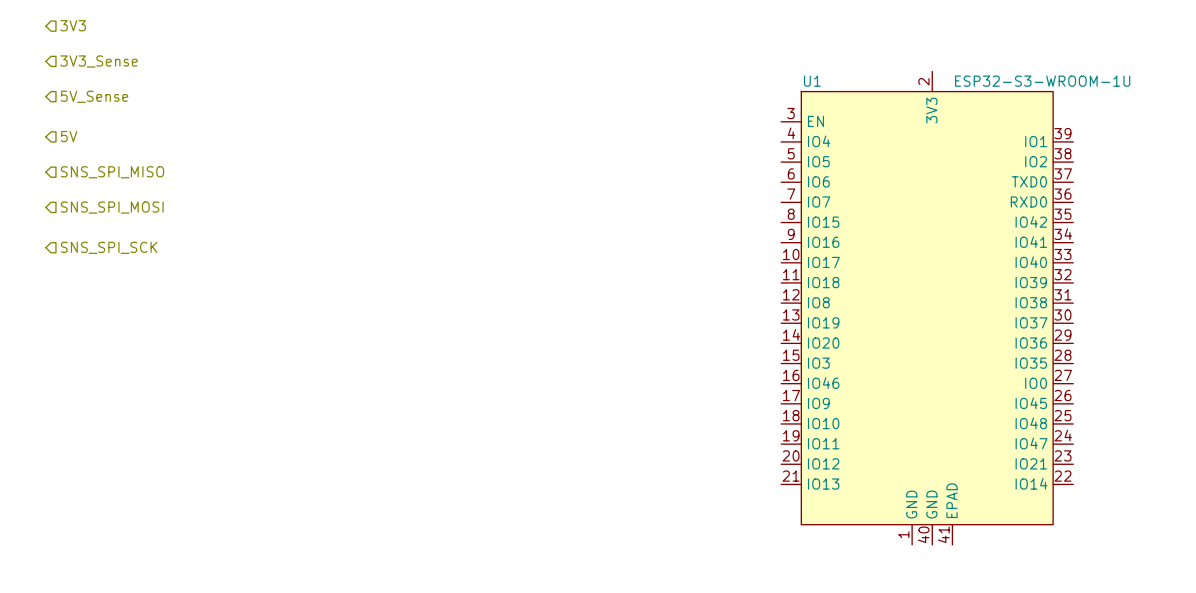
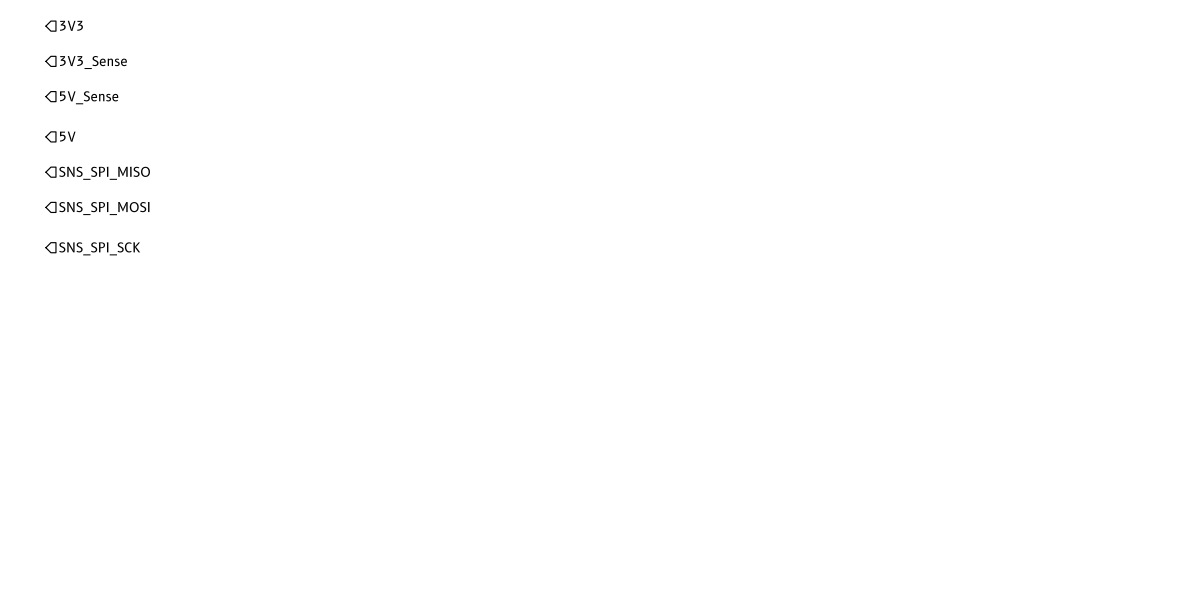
U1: ESP32-S3-WROOM-1U (927, 308) -> none

